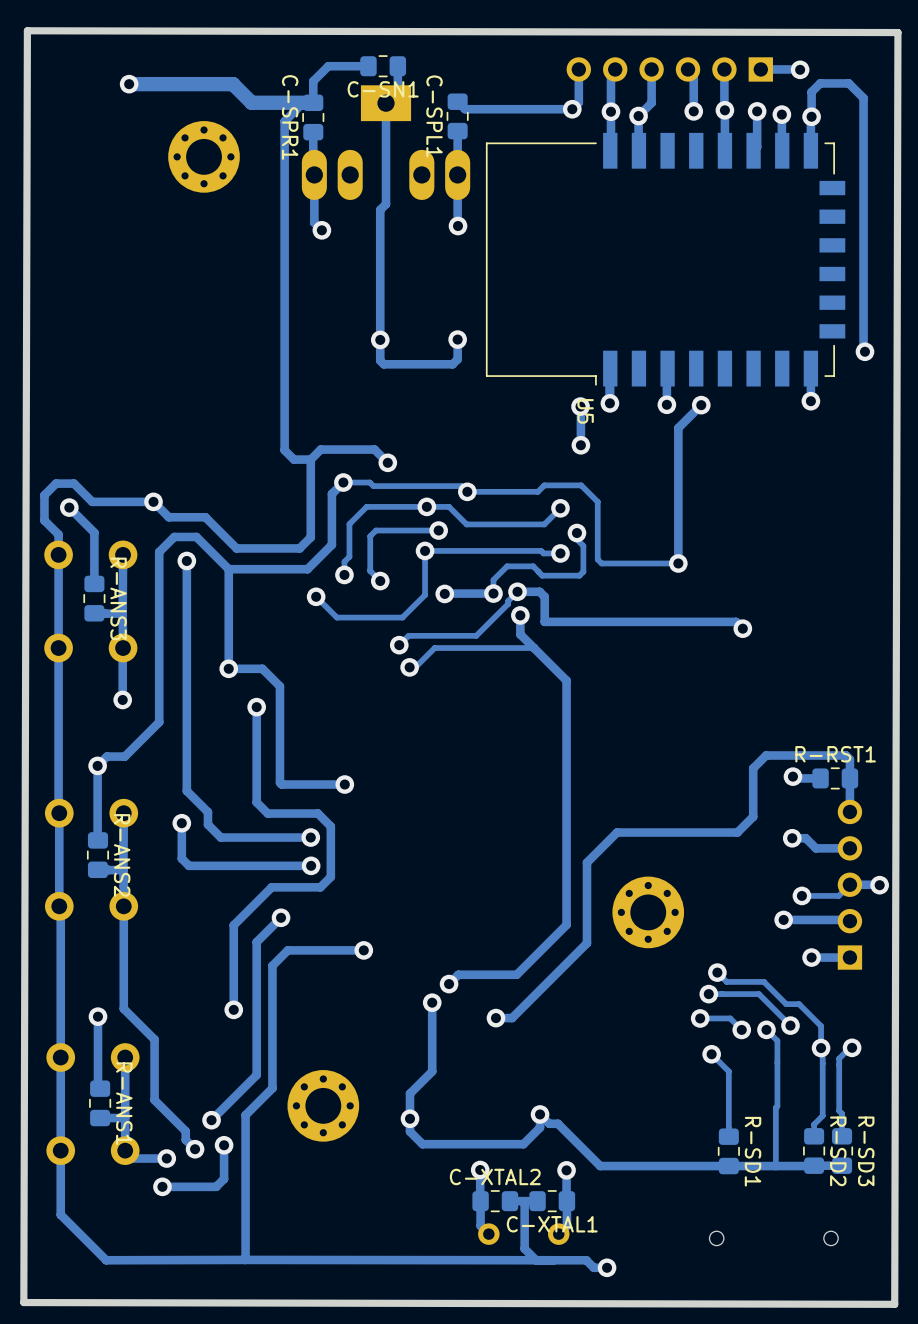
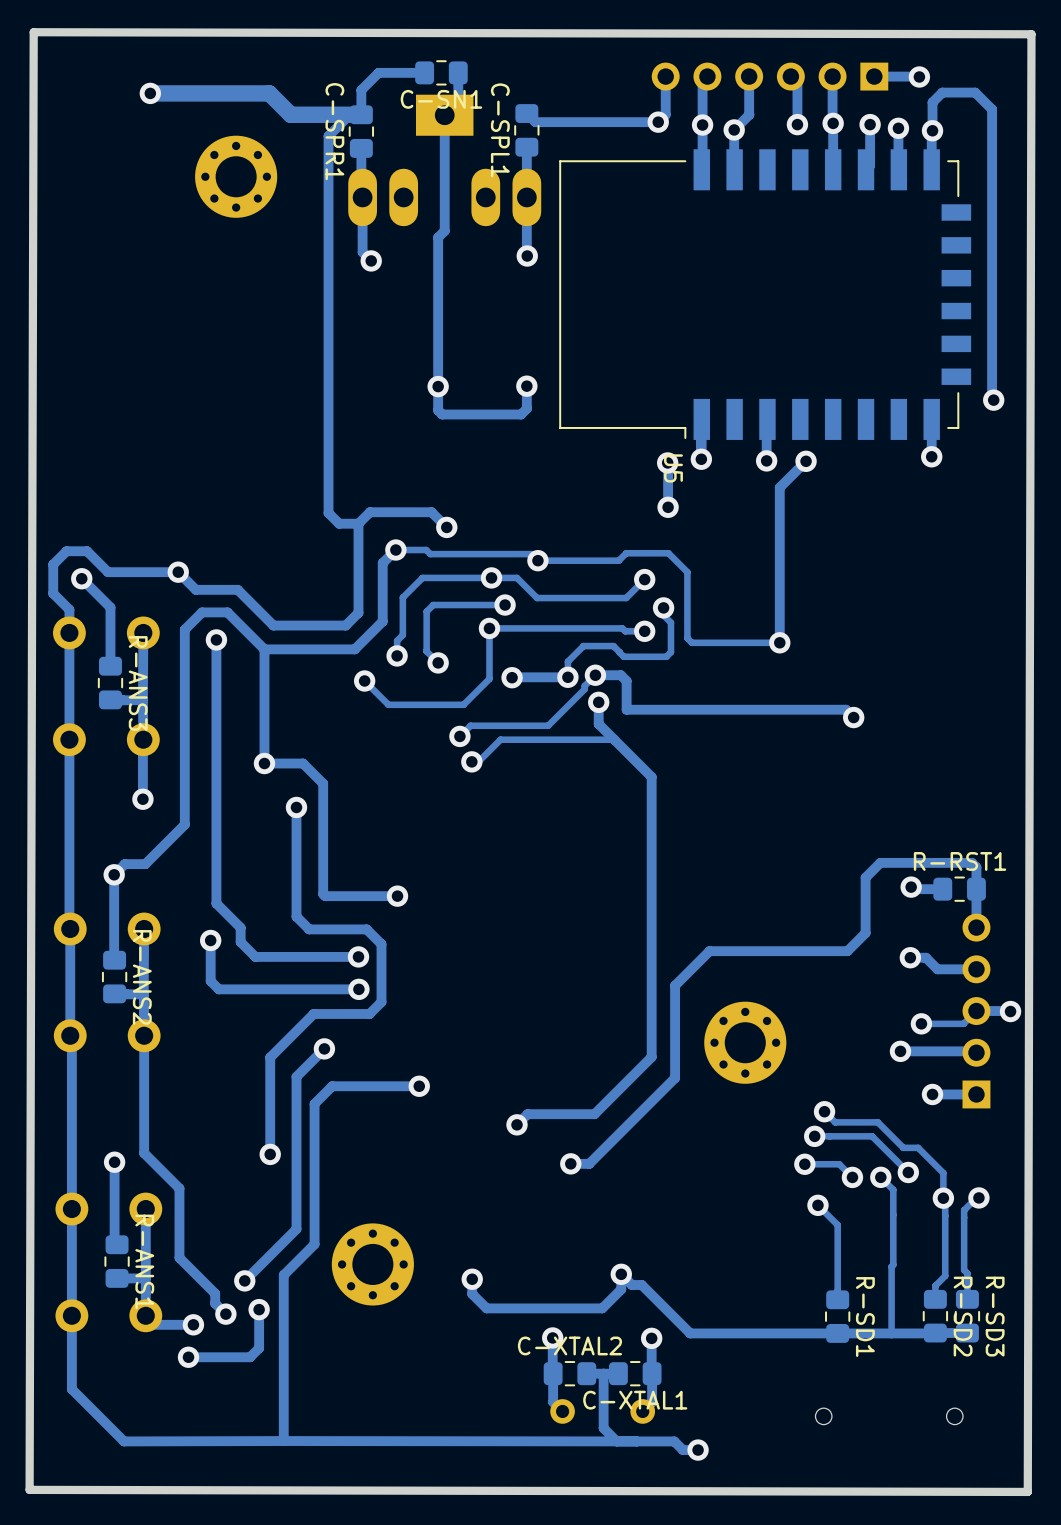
track: (432, 1002) (432, 1071) (410, 1093) (410, 1118) -> none
via: (432, 1002) -> none

